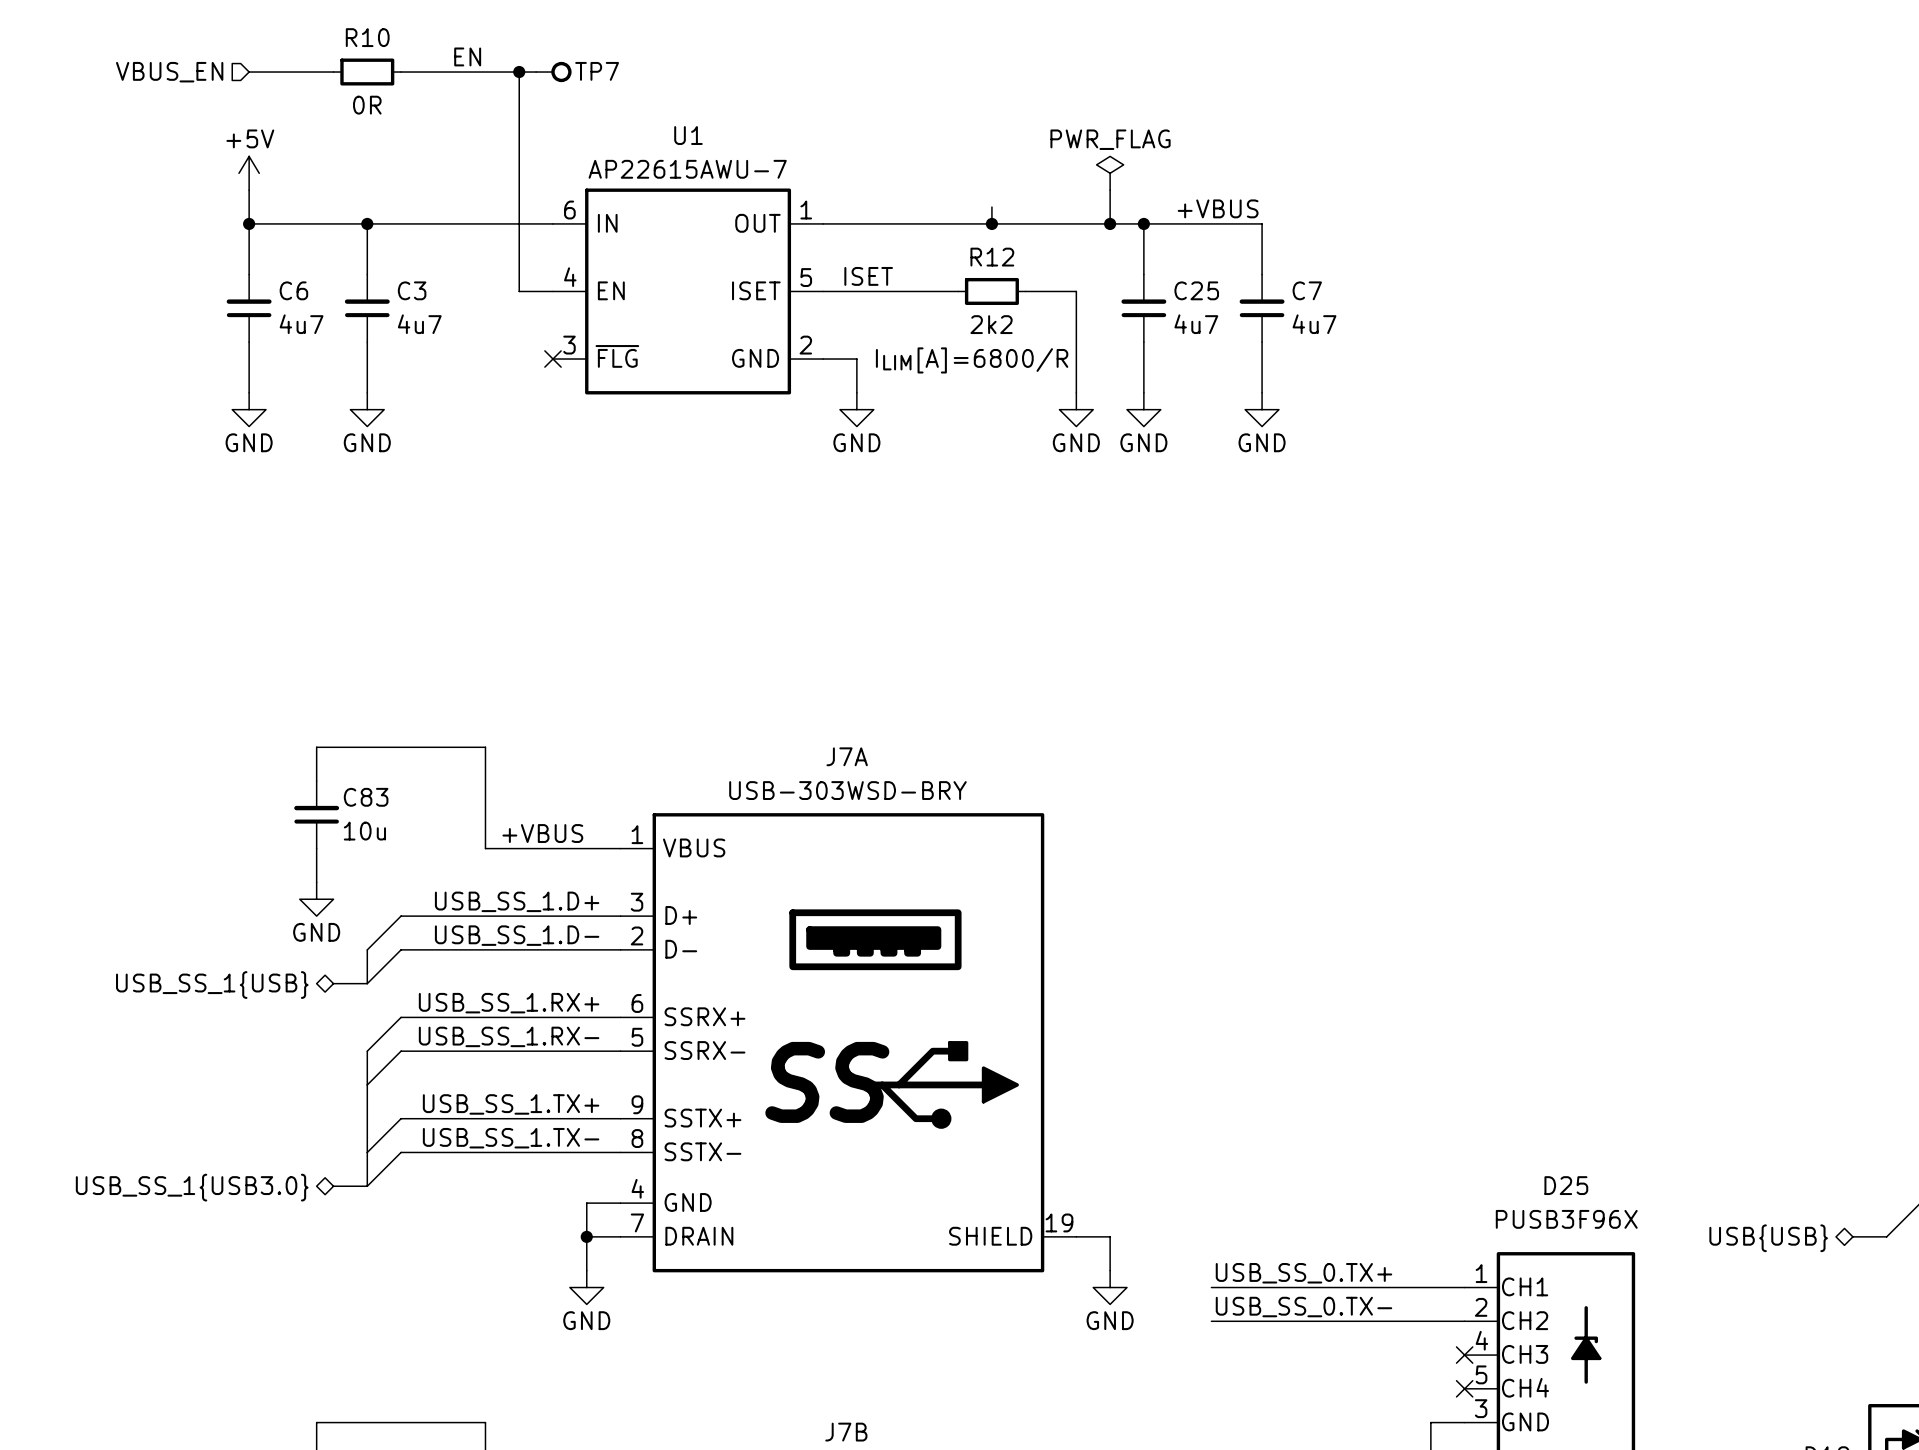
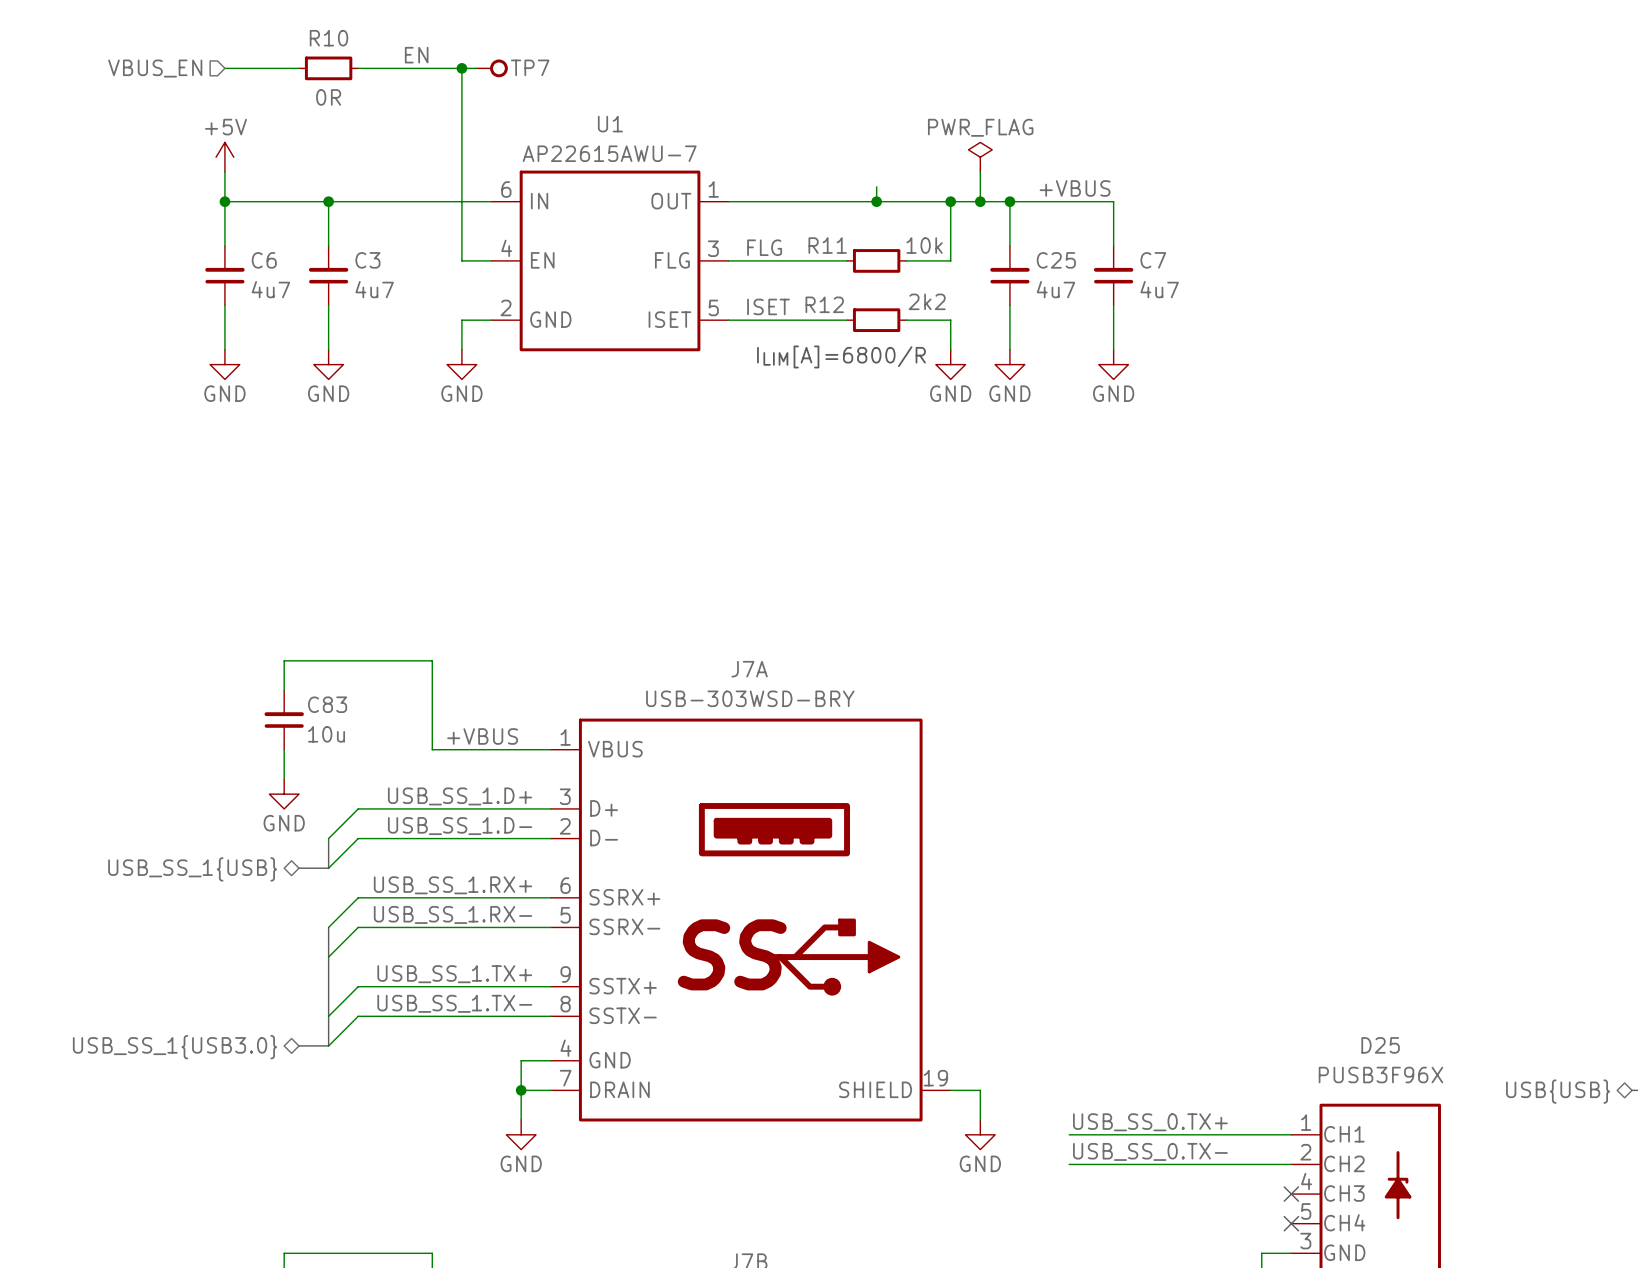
wire: none -> (950, 201) (950, 260)
junction: none -> (950, 201)
R12 name: R12 (992, 257) -> R11 (827, 245)
label: ISET (868, 276) -> FLG (764, 247)
U1 pin number: 5 (806, 277) -> 3 (713, 248)
U1 pin name: ISET (756, 290) -> FLG (672, 260)
wire: (1076, 291) (1076, 359) -> (906, 320) (950, 320)
R12 text: 2k2 (991, 324) -> 10k (924, 245)
label: none -> ISET (768, 306)
U1 pin number: 3 (569, 345) -> 2 (506, 307)
U1 pin number: 2 (805, 345) -> 5 (713, 307)
U1 pin name: ~{FLG} (617, 356) -> GND (550, 319)
U1 pin name: GND (755, 358) -> ISET (669, 319)
wire: none -> (491, 320) (461, 320) (461, 349)
no-connect mark: (553, 359) -> none
wire: (856, 359) (856, 392) -> (758, 320) (847, 320)
R12: none -> (876, 320)
text position: ILIM[A]=6800/R (972, 360) -> ILIM[A]=6800/R (841, 356)
power symbol: none -> GND (461, 364)
power symbol: GND (856, 409) -> none

